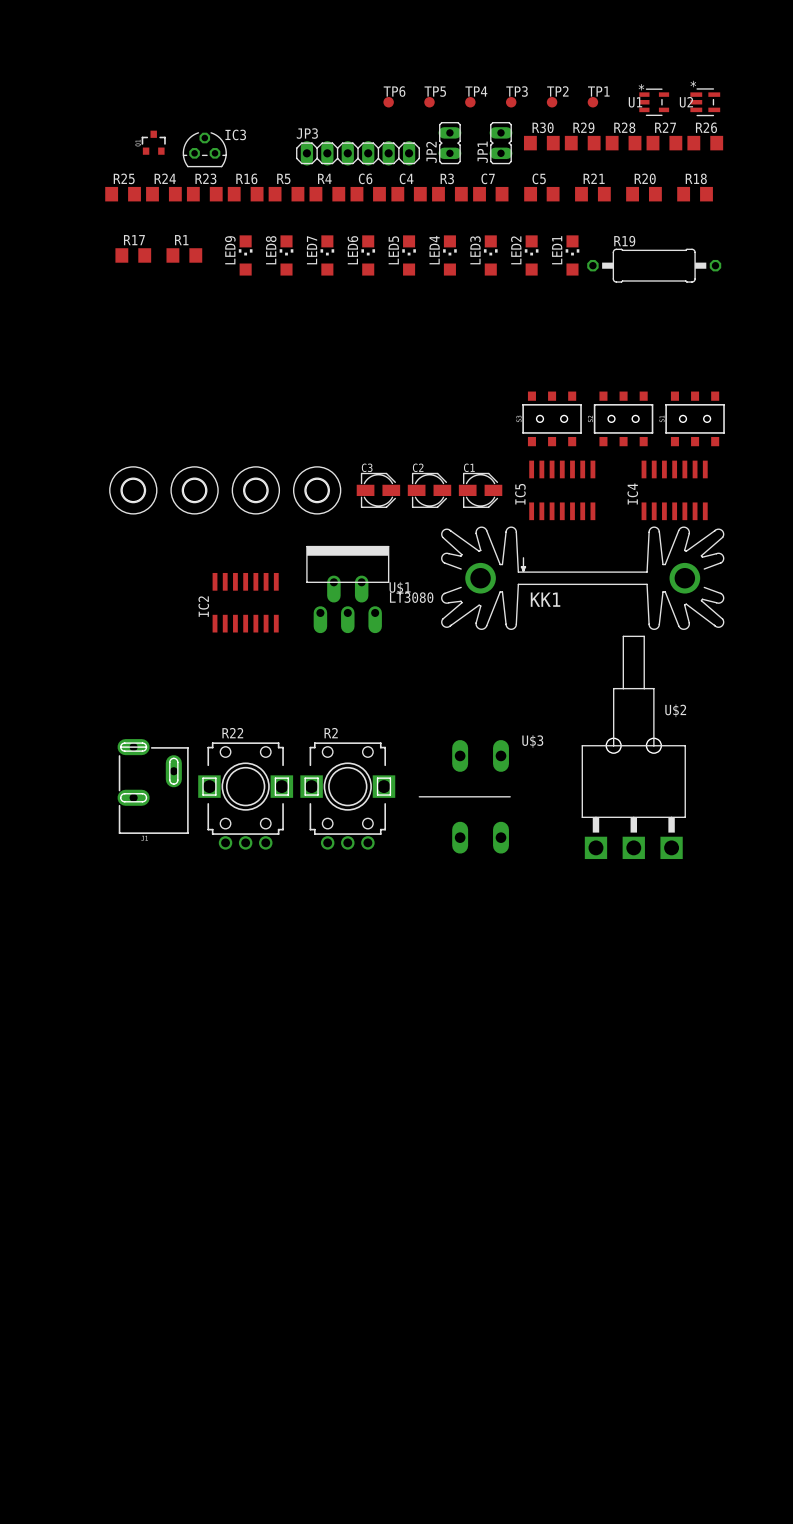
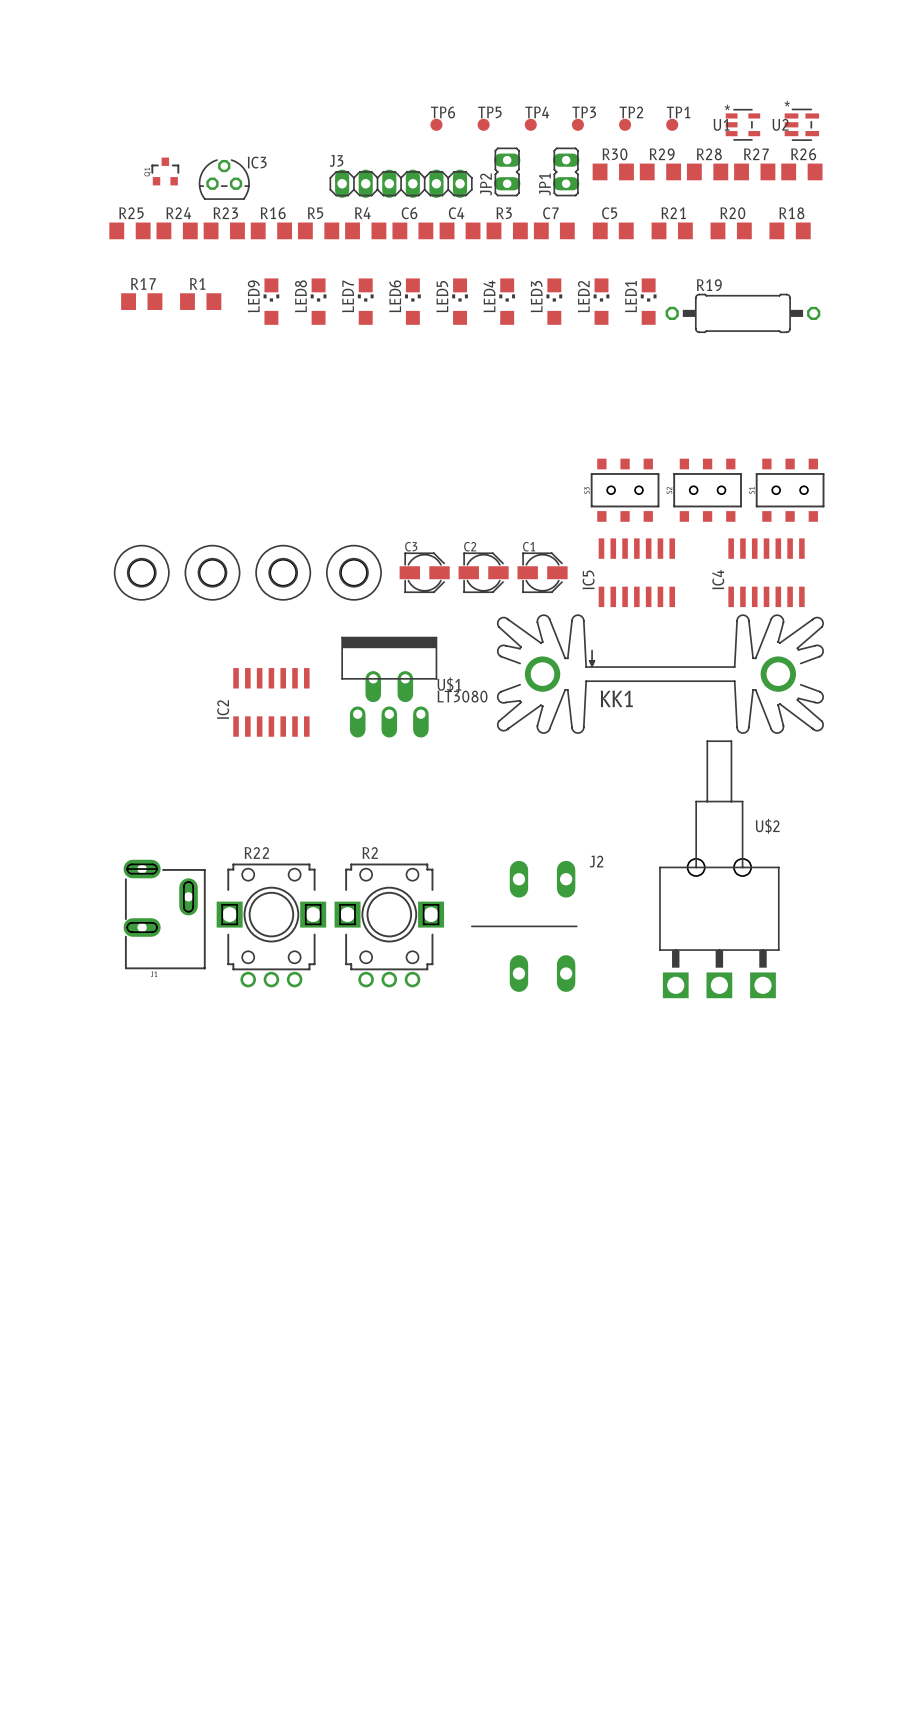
JP3 name: JP3 (307, 133) -> J3 (336, 160)
U$3 name: U$3 (532, 741) -> J2 (596, 861)

